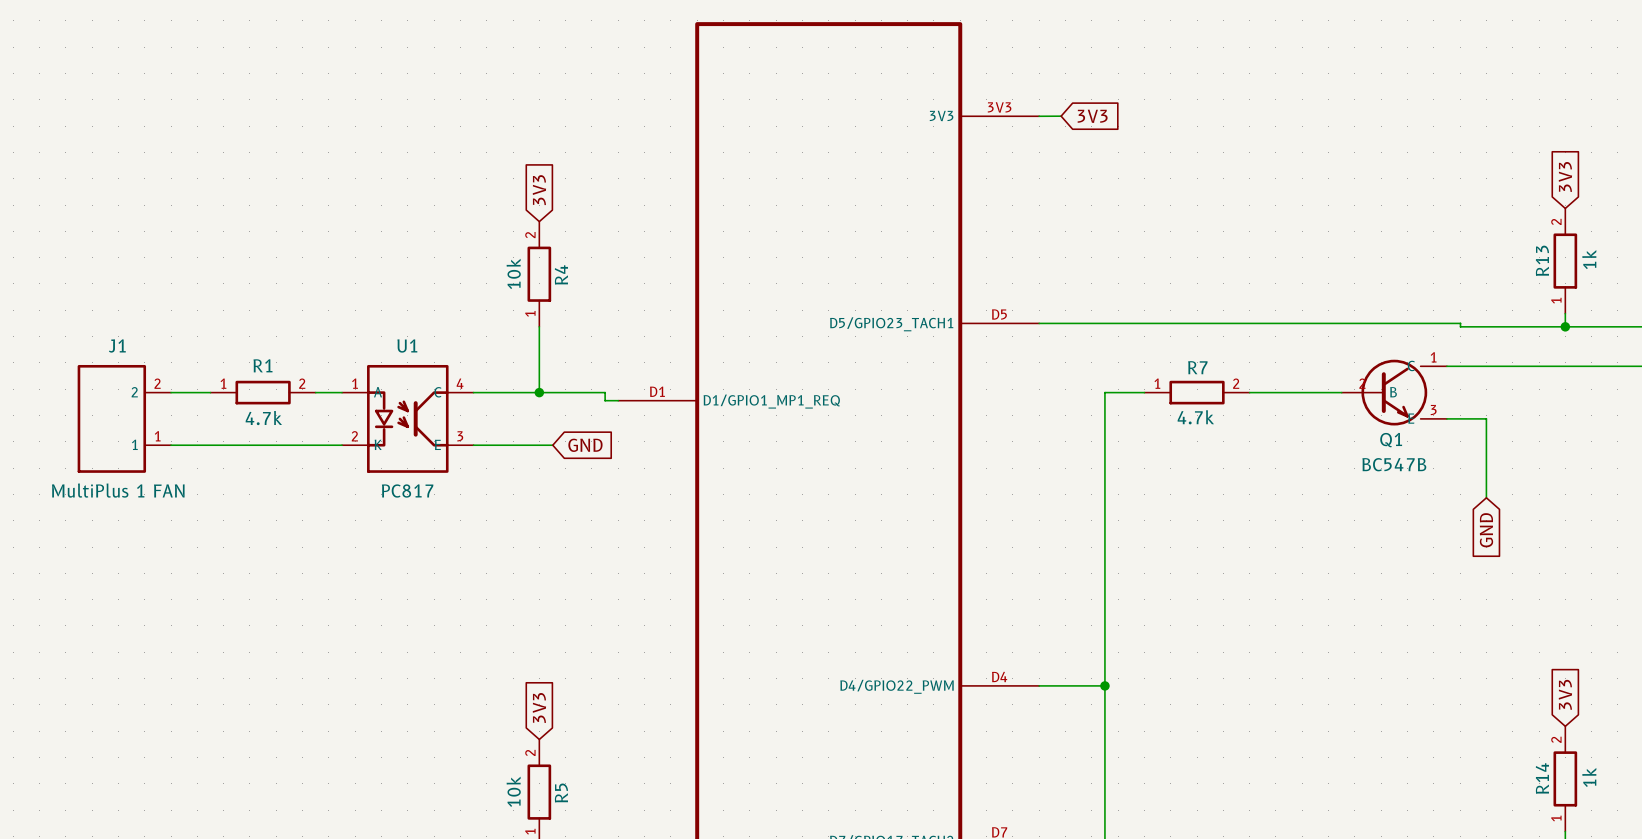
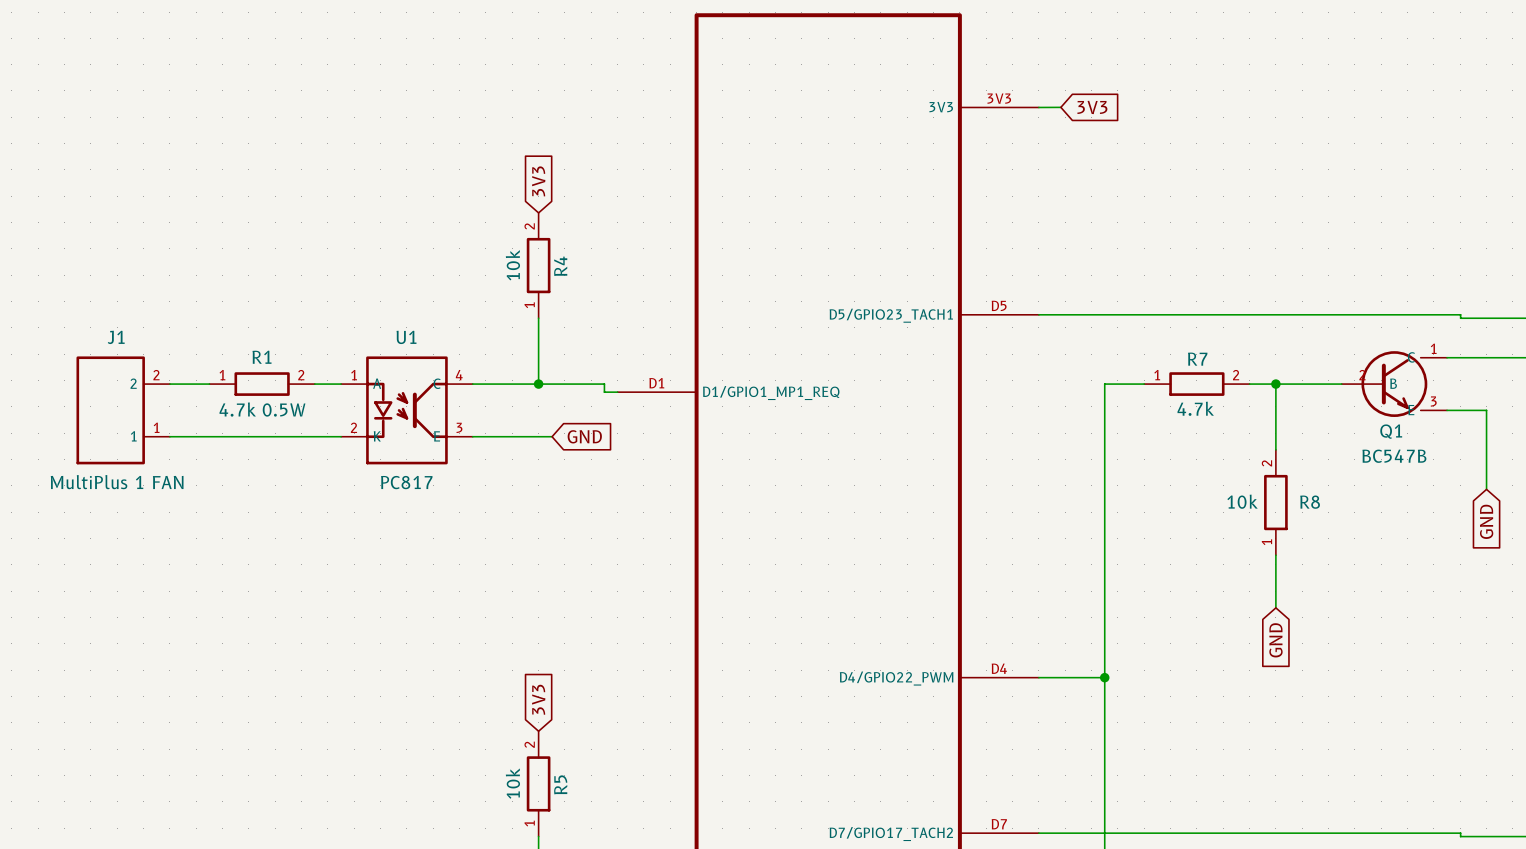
wire: none -> (1275, 384) (1275, 449)
junction: none -> (1275, 384)
R1 value: 4.7k (263, 418) -> 4.7k 0.5W (262, 409)
R8: none -> 10k (1275, 502)
wire: none -> (1275, 555) (1275, 607)
global label: none -> GND (1275, 640)

